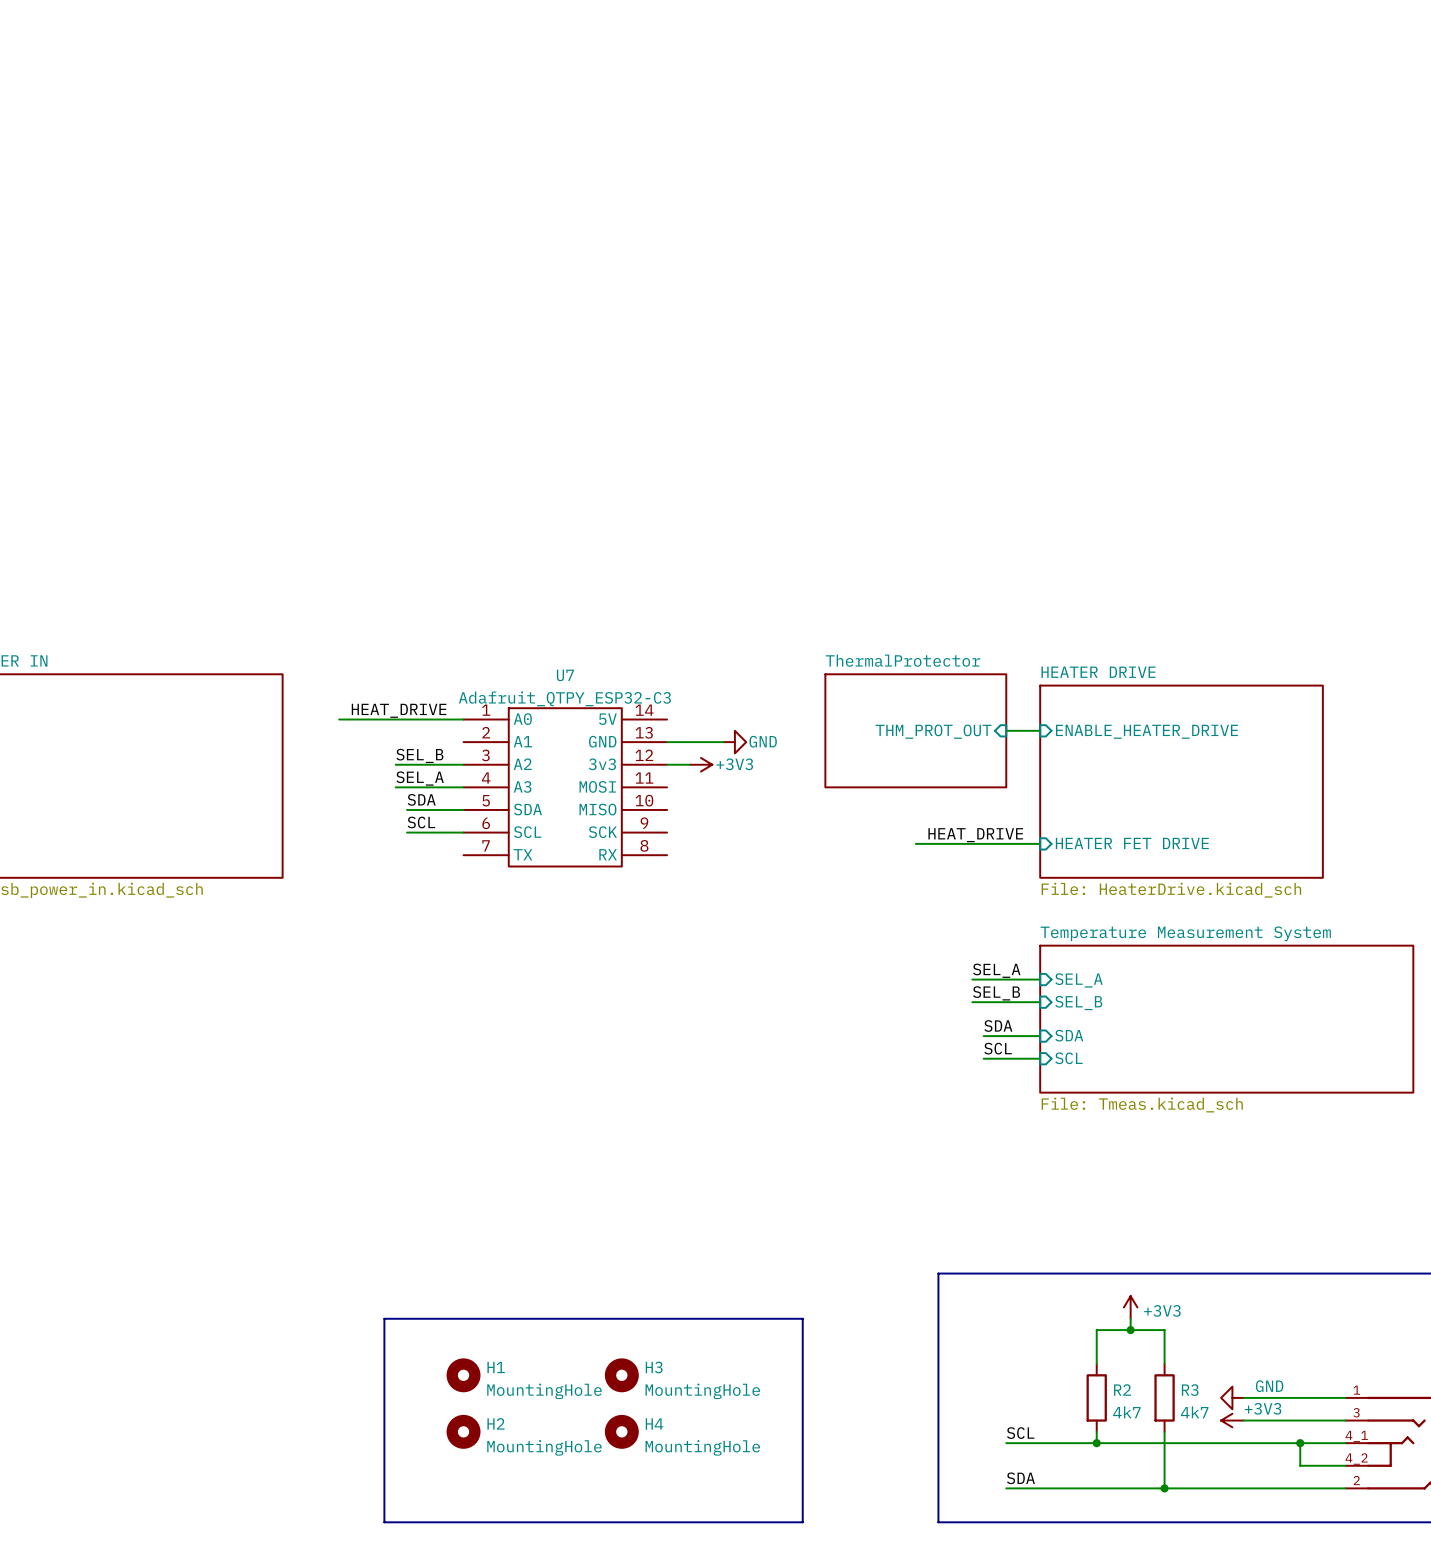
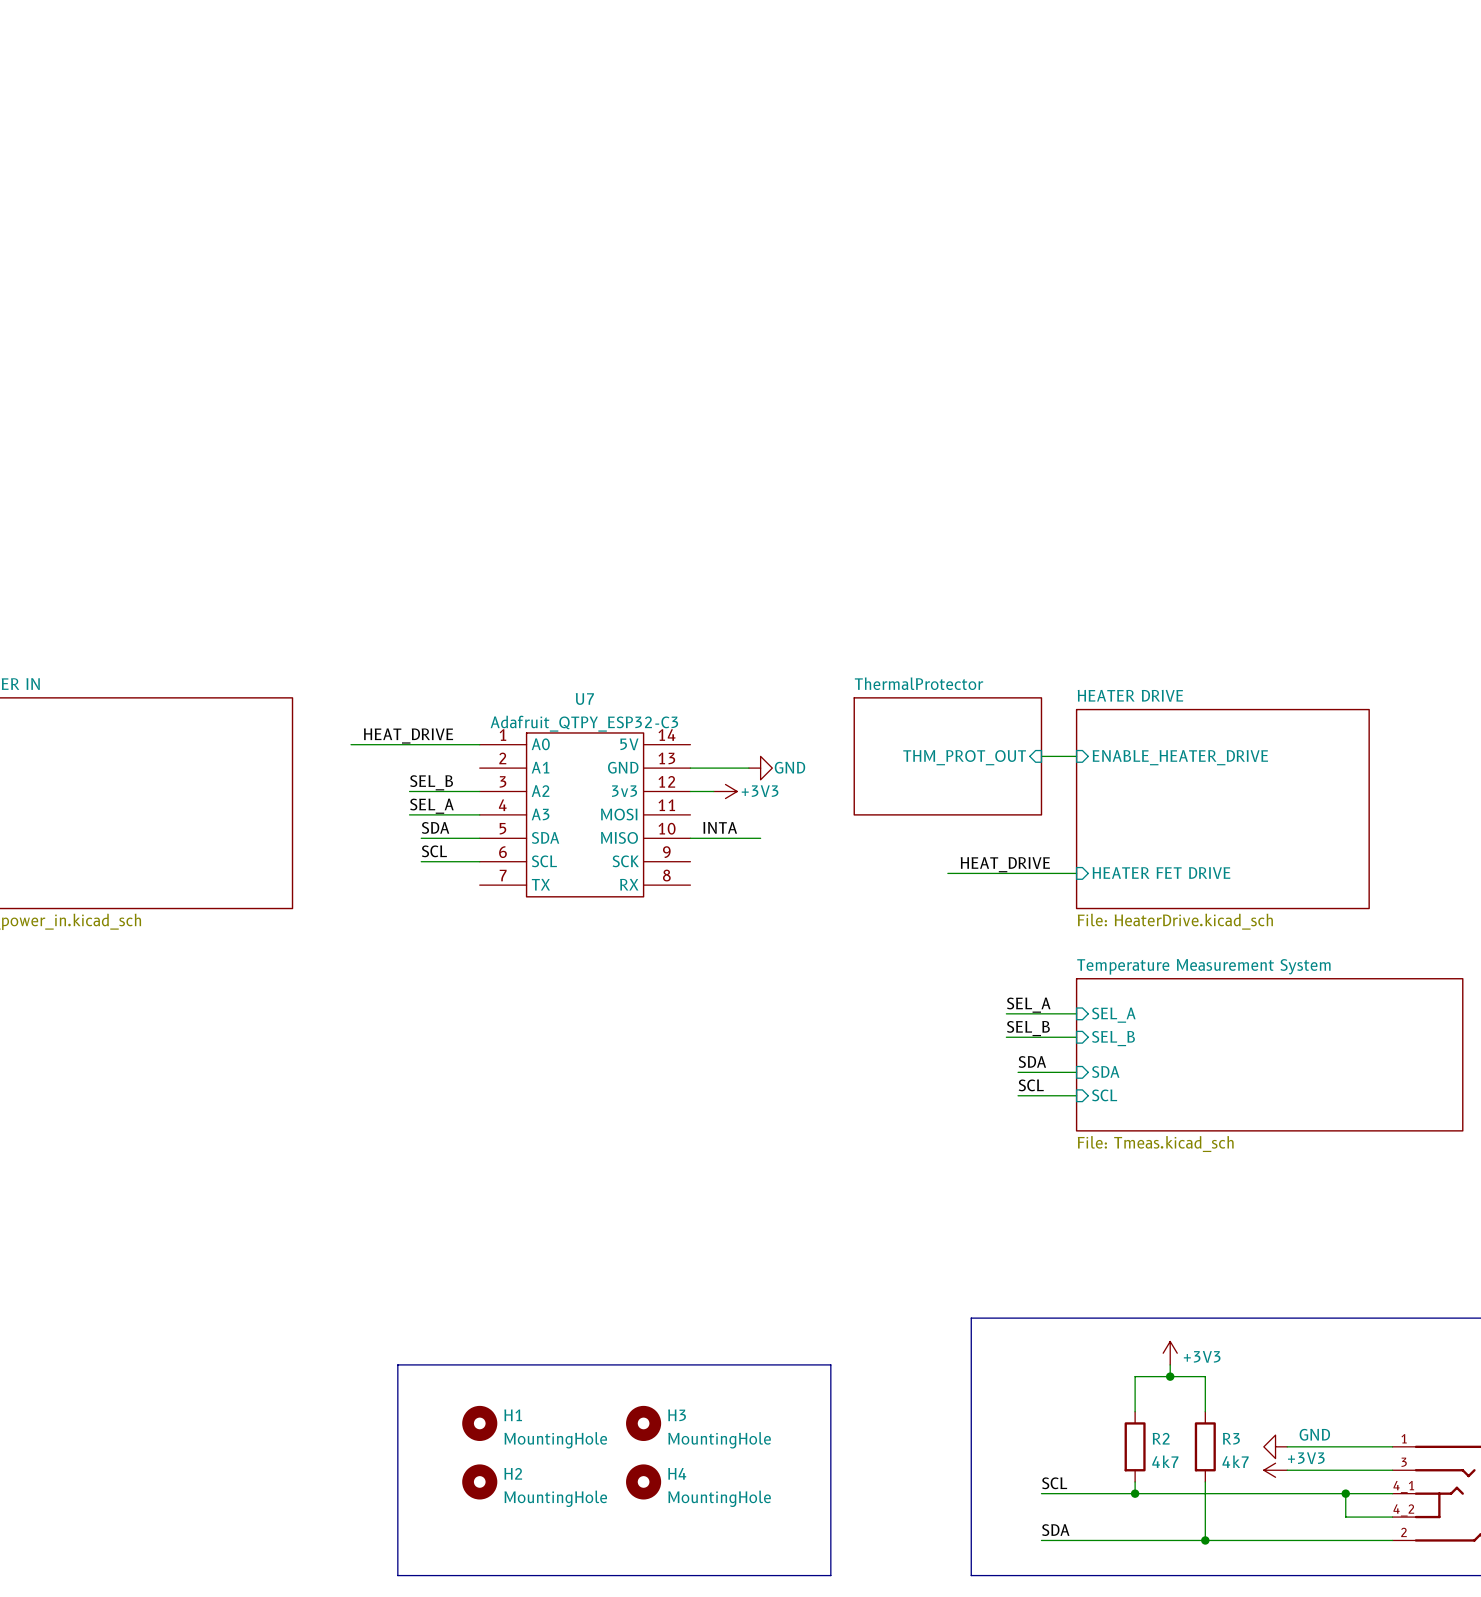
label: none -> INTA (720, 827)
wire: none -> (690, 838) (760, 838)

